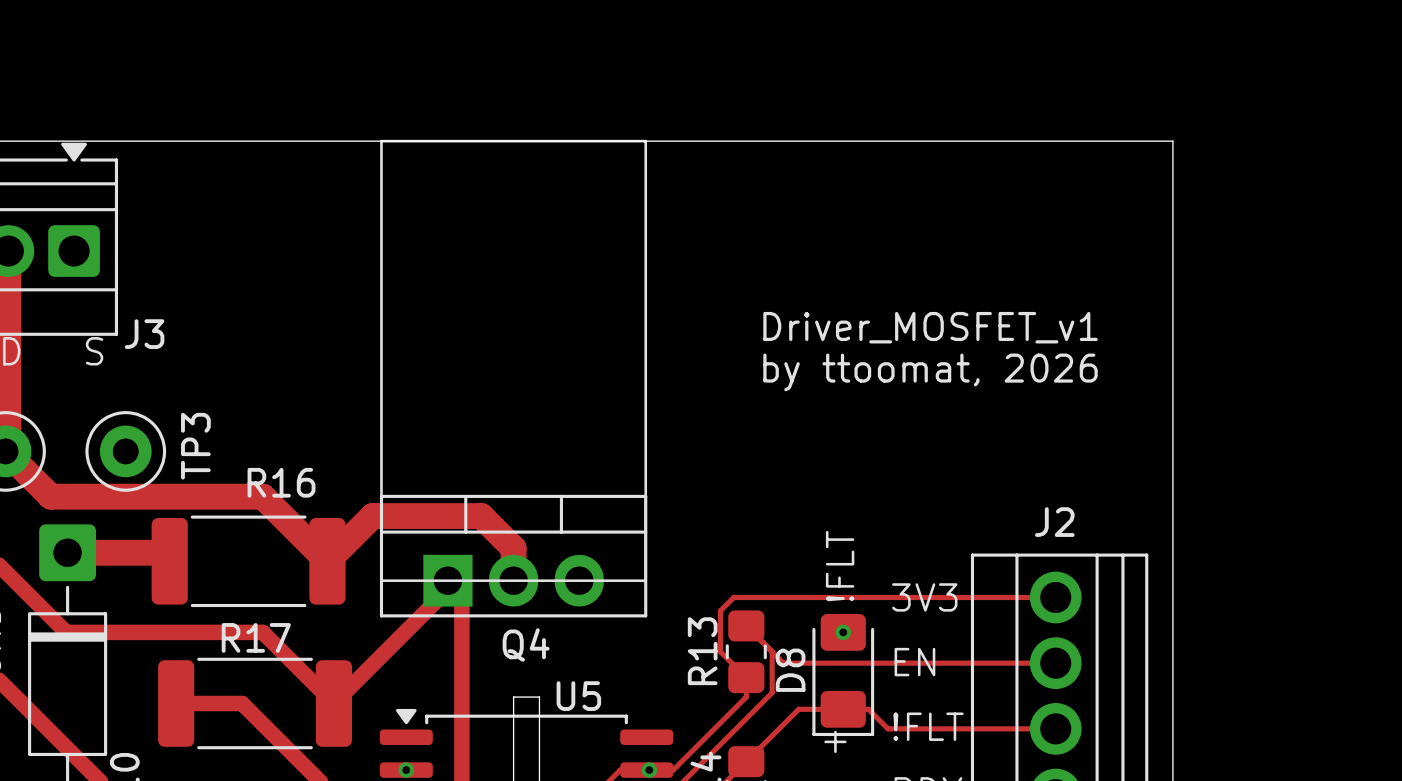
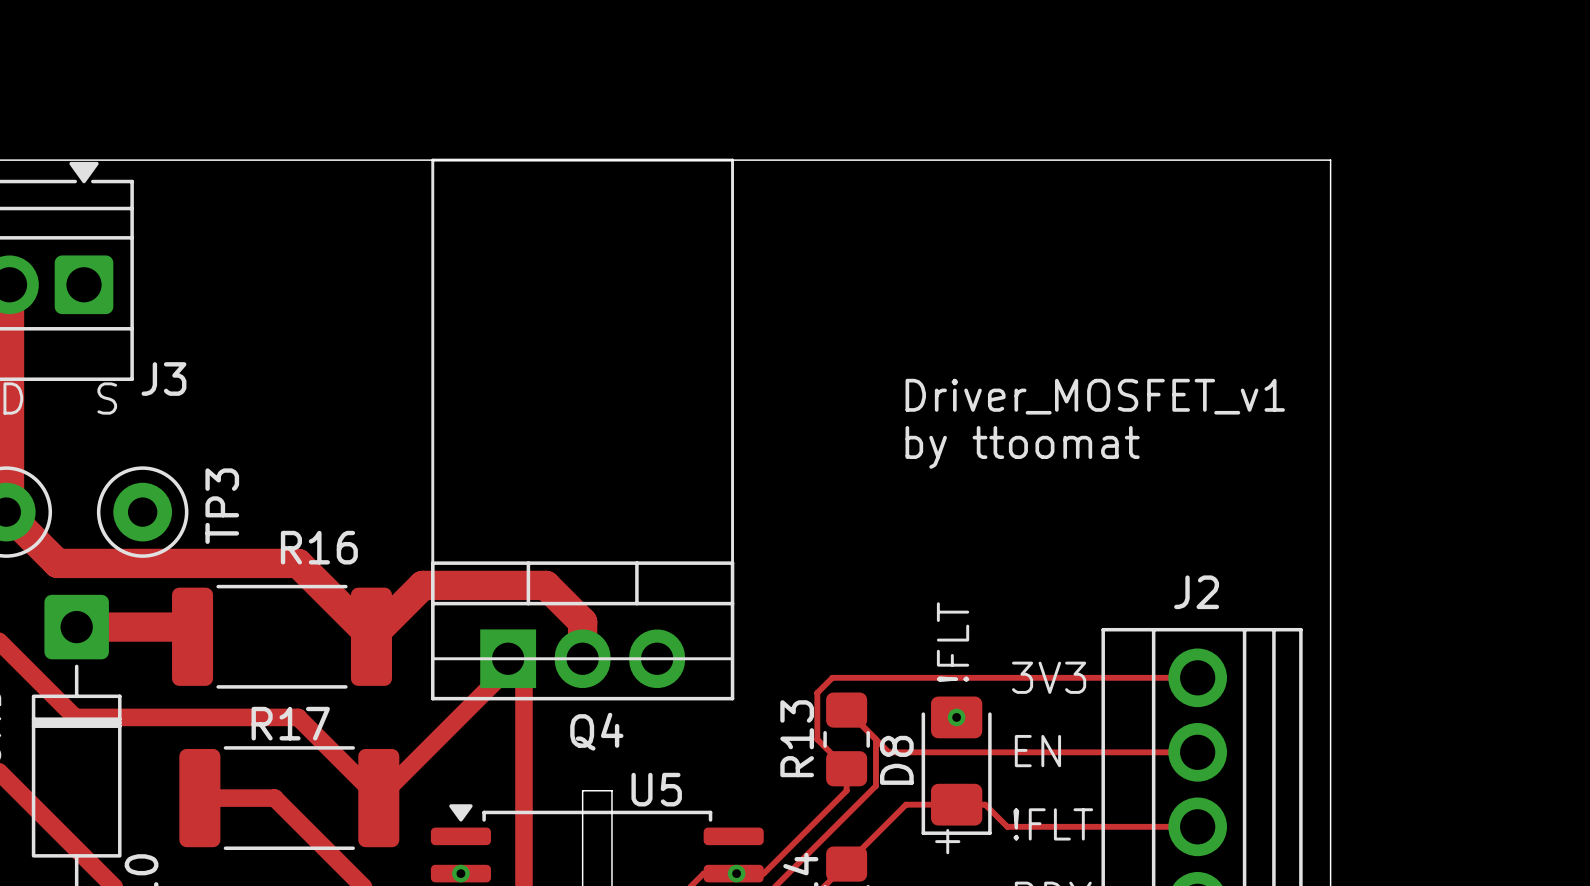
text position: Driver_MOSFET_v1 (930, 327) -> Driver_MOSFET_v1 (1095, 396)
text: by ttoomat, 2026 (930, 372) -> by ttoomat (1022, 447)

